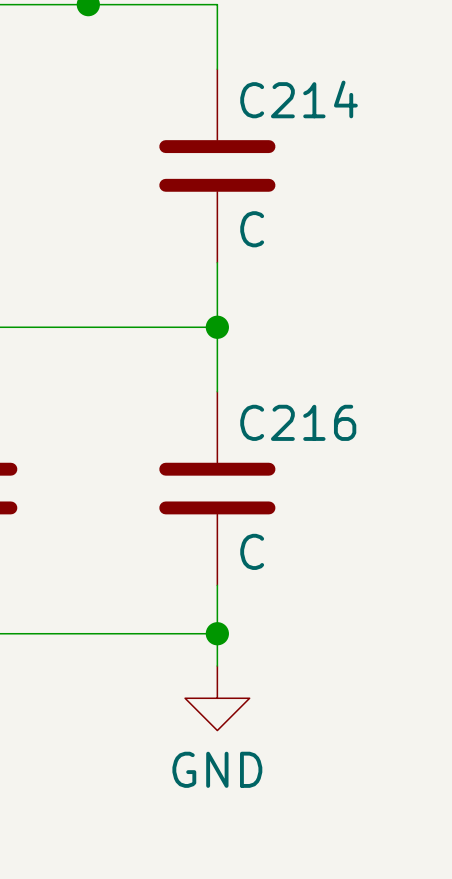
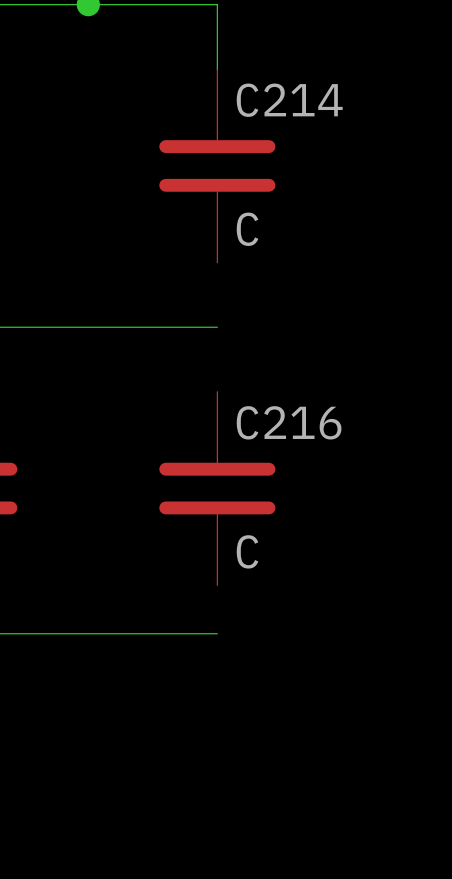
wire: (217, 262) (217, 391) -> none
junction: (217, 327) -> none
wire: (217, 585) (217, 666) -> none
junction: (217, 633) -> none
power symbol: GND (217, 698) -> none

